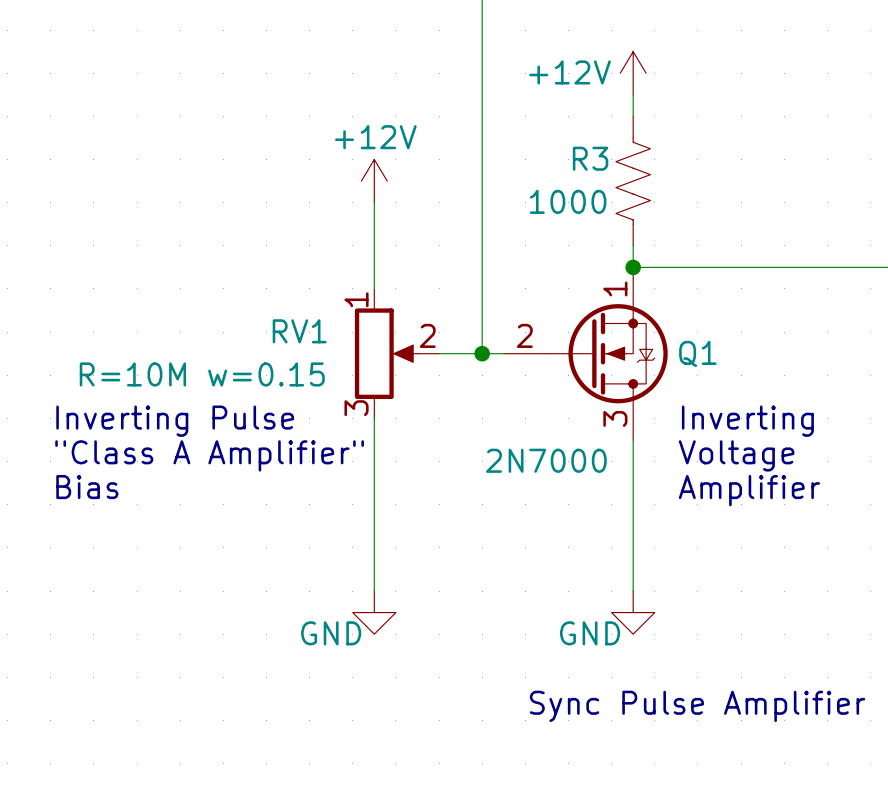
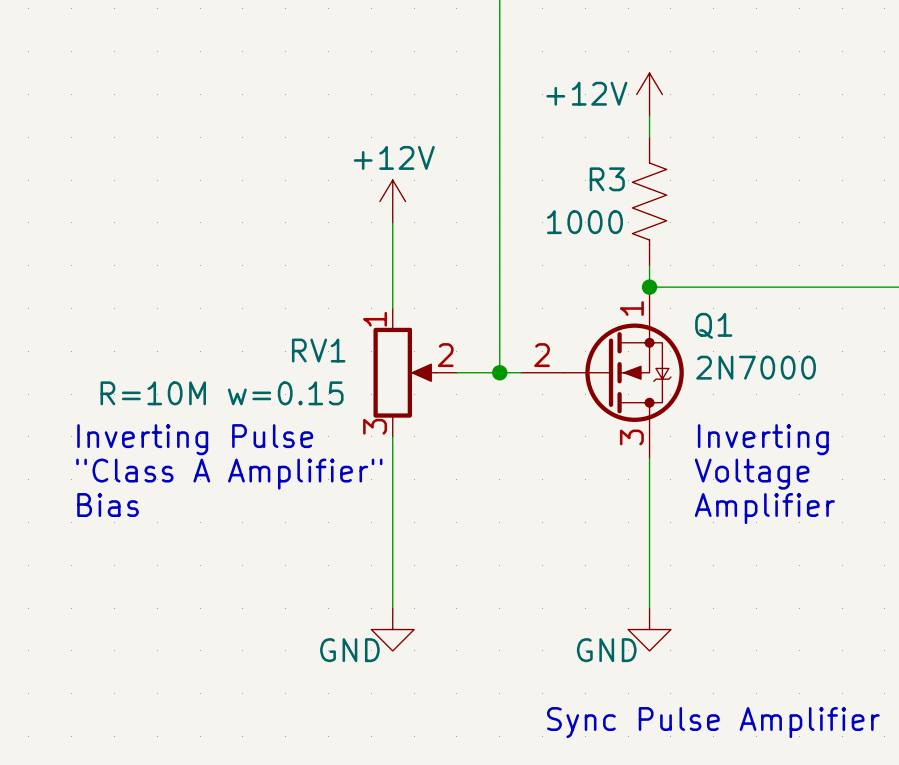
Q1 name position: Q1 (697, 353) -> Q1 (713, 325)
Q1 value position: 2N7000 (546, 460) -> 2N7000 (756, 367)

